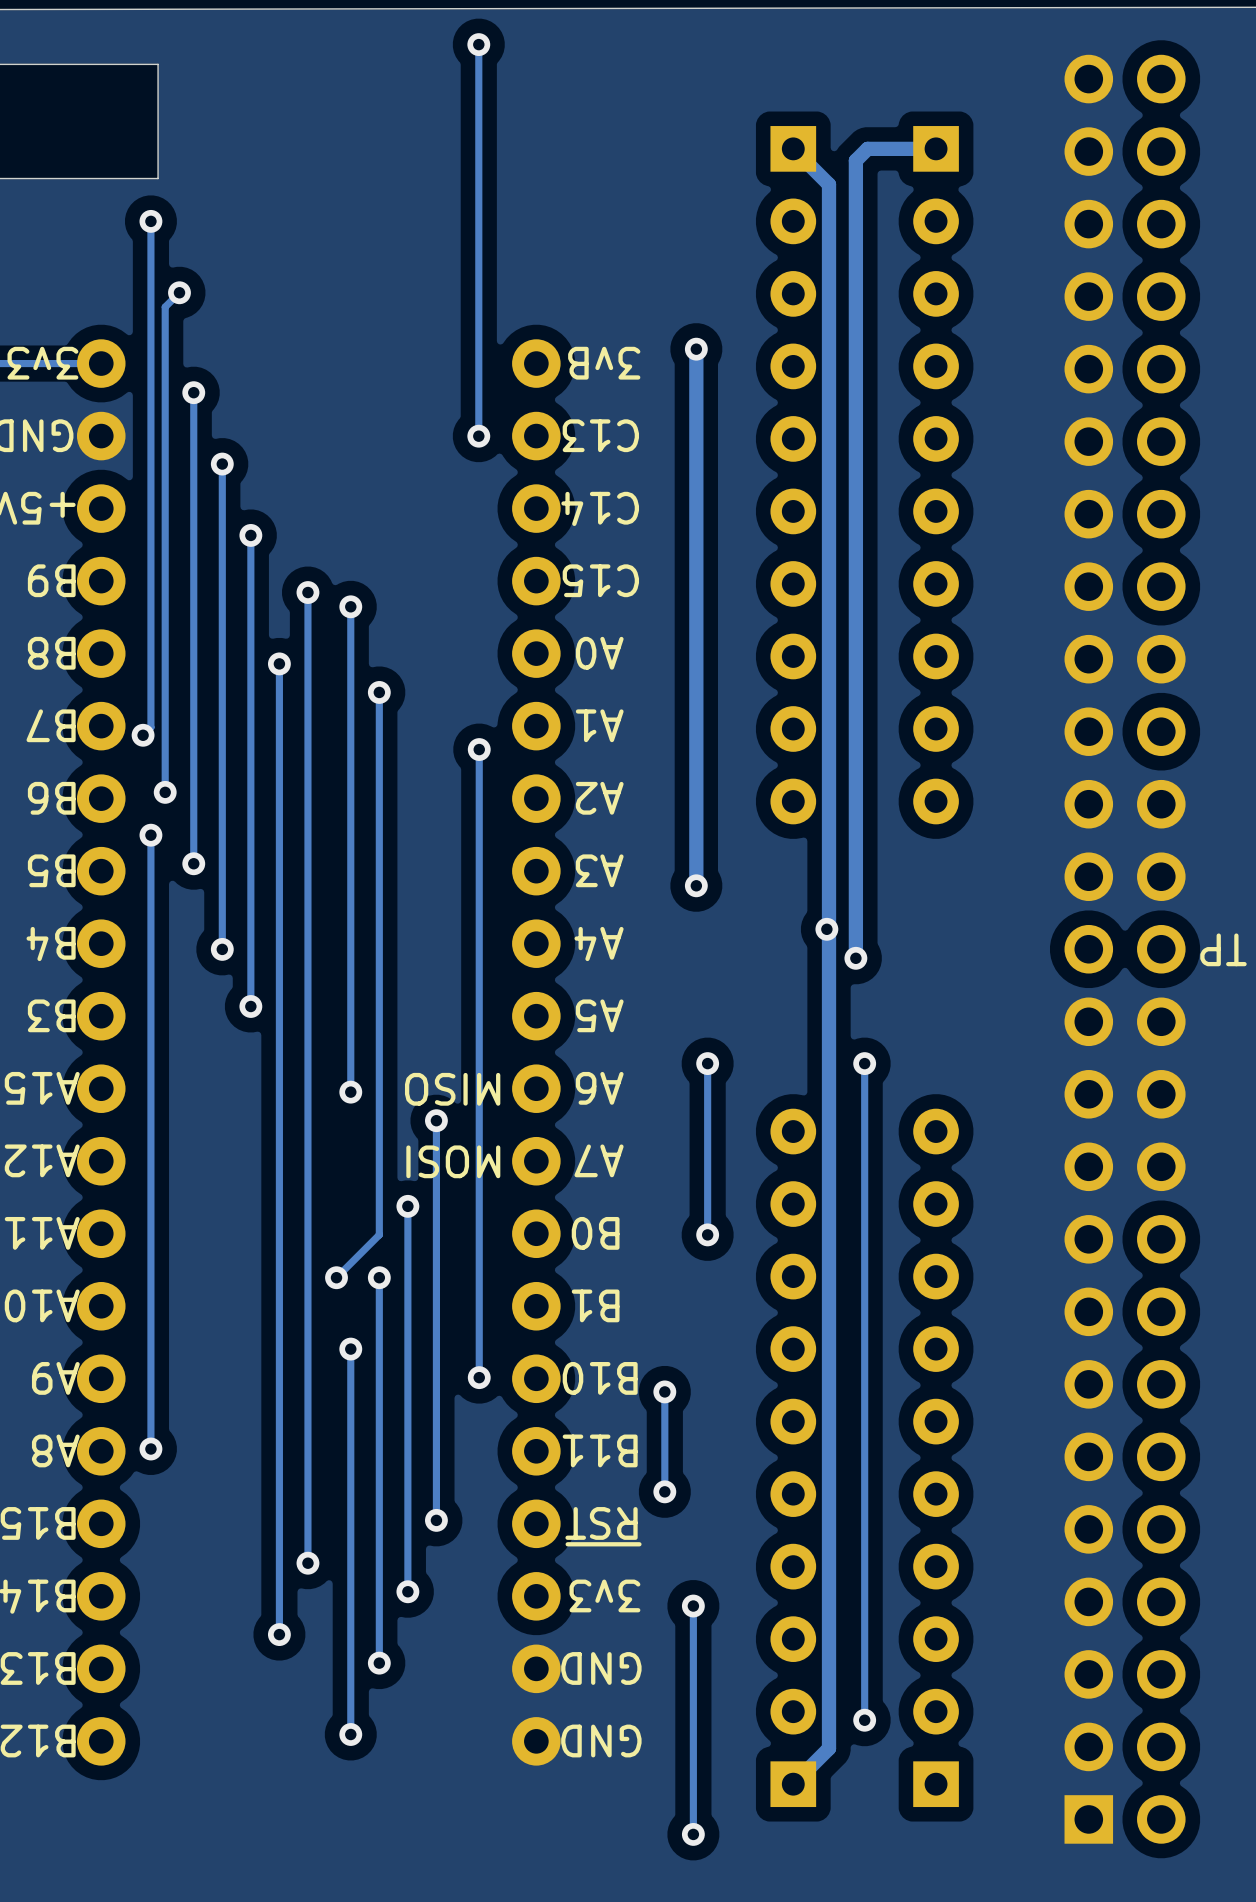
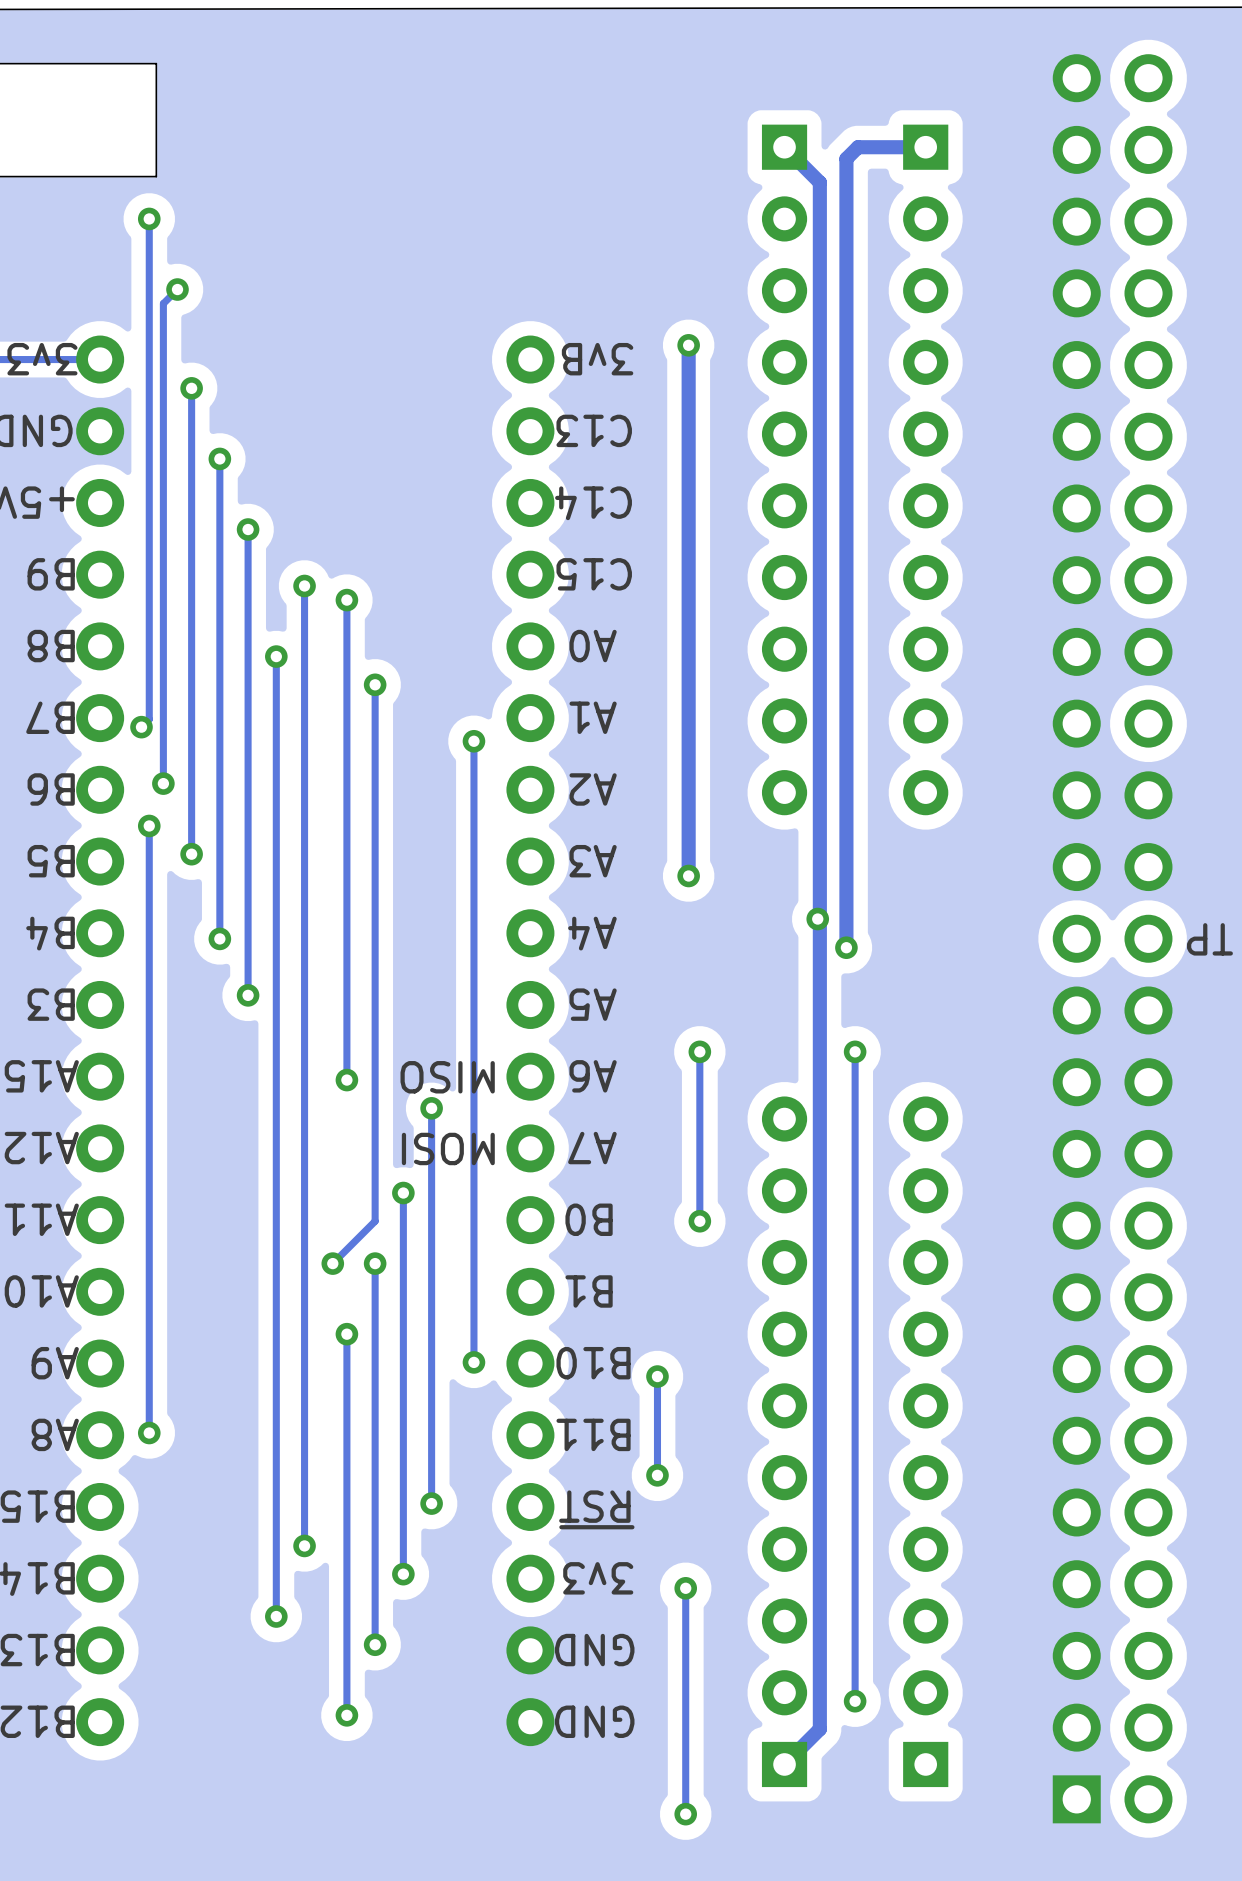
track: (478, 44) (478, 436) -> none
via: (478, 44) -> none
via: (478, 436) -> none

